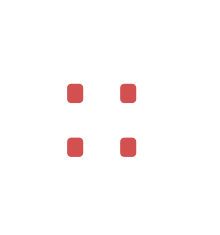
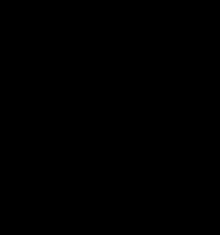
part: (101, 93) -> none
part: (101, 147) -> none

